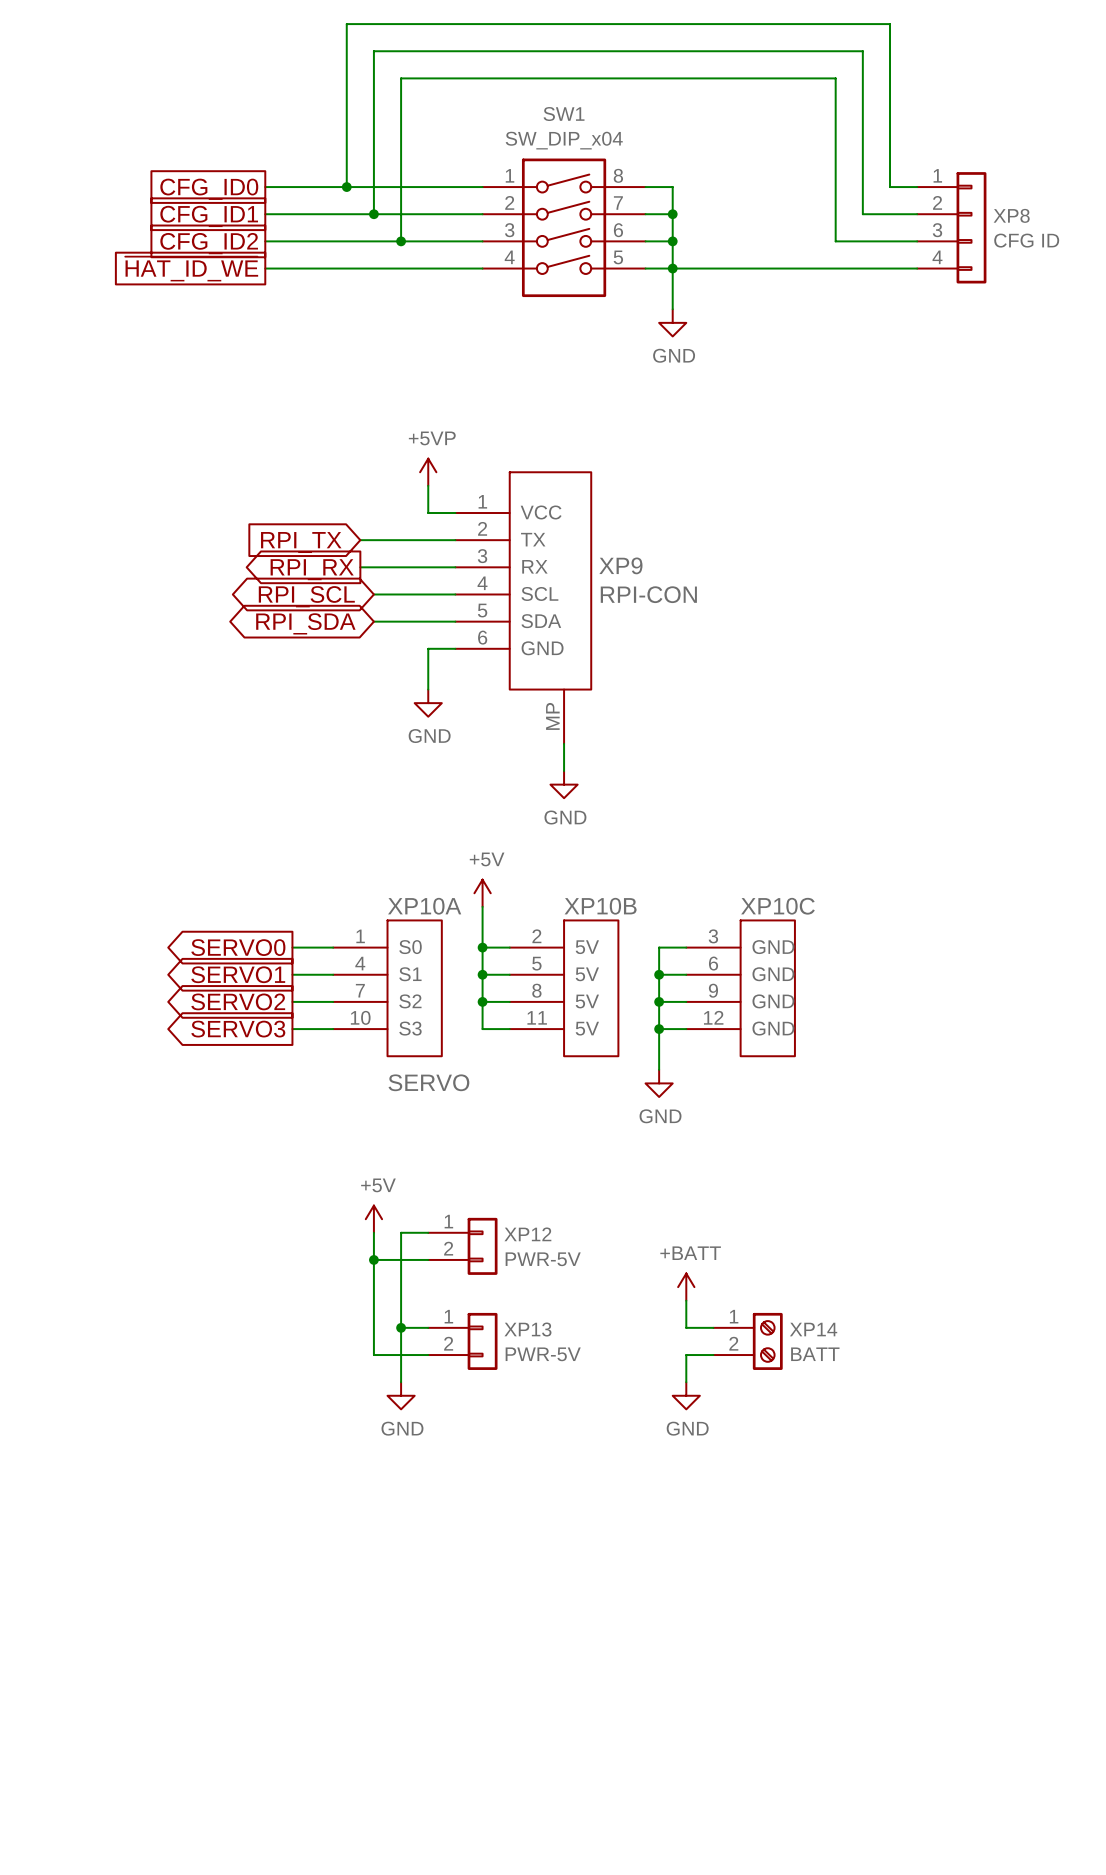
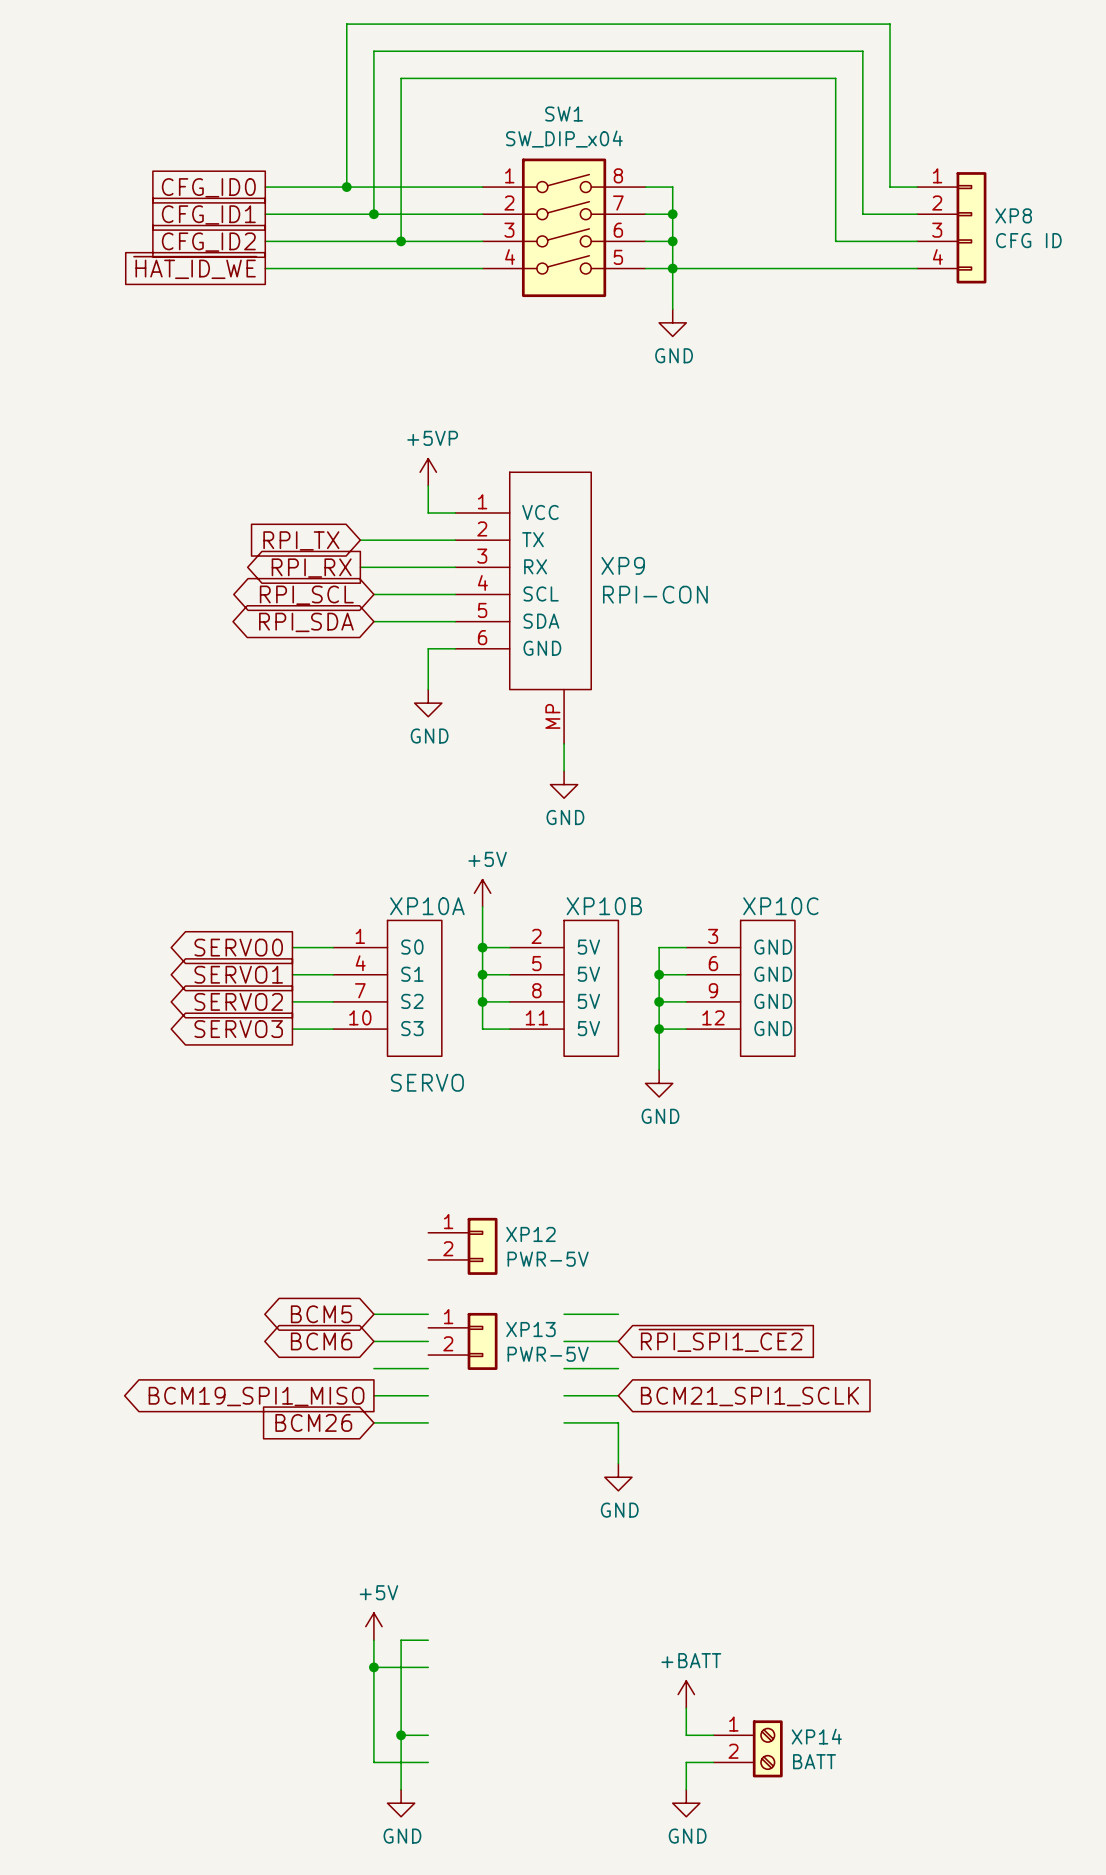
power symbol: +5V (373, 1219) -> none
wire: (373, 1232) (373, 1355) (428, 1355) -> none
wire: (428, 1232) (401, 1232) (401, 1382) -> none
wire: (373, 1259) (428, 1259) -> (373, 1314) (428, 1314)
junction: (373, 1259) -> none
power symbol: +BATT (686, 1287) -> none
wire: (686, 1300) (686, 1327) (713, 1327) -> none
global label: none -> BCM5 (321, 1314)
wire: none -> (564, 1314) (618, 1314)
wire: (401, 1327) (428, 1327) -> none
junction: (401, 1327) -> none
global label: none -> BCM6 (321, 1341)
wire: none -> (373, 1341) (428, 1341)
wire: none -> (564, 1341) (618, 1341)
global label: none -> ~{RPI_SPI1_CE2} (721, 1340)
XP14 position: (748, 1341) -> (748, 1748)
wire: (713, 1355) (686, 1355) (686, 1382) -> none
wire: none -> (373, 1368) (428, 1368)
wire: none -> (564, 1368) (618, 1368)
wire: none -> (373, 1395) (428, 1395)
power symbol: GND (401, 1395) -> none
wire: none -> (564, 1395) (618, 1395)
power symbol position: GND (686, 1395) -> GND (618, 1477)
global label: none -> BCM19_SPI1_MISO (256, 1396)
global label: none -> BCM21_SPI1_SCLK (749, 1396)
global label: none -> BCM26 (313, 1422)
wire: none -> (373, 1422) (428, 1422)
wire: none -> (564, 1422) (618, 1422) (618, 1463)
power symbol: none -> +5V (373, 1626)
wire: none -> (373, 1640) (373, 1762) (428, 1762)
wire: none -> (428, 1640) (401, 1640) (401, 1789)
wire: none -> (373, 1667) (428, 1667)
junction: none -> (373, 1667)
power symbol: none -> +BATT (686, 1694)
wire: none -> (686, 1708) (686, 1735) (713, 1735)
wire: none -> (401, 1735) (428, 1735)
junction: none -> (401, 1735)
wire: none -> (713, 1762) (686, 1762) (686, 1789)
power symbol: none -> GND (401, 1803)
power symbol: none -> GND (686, 1803)

